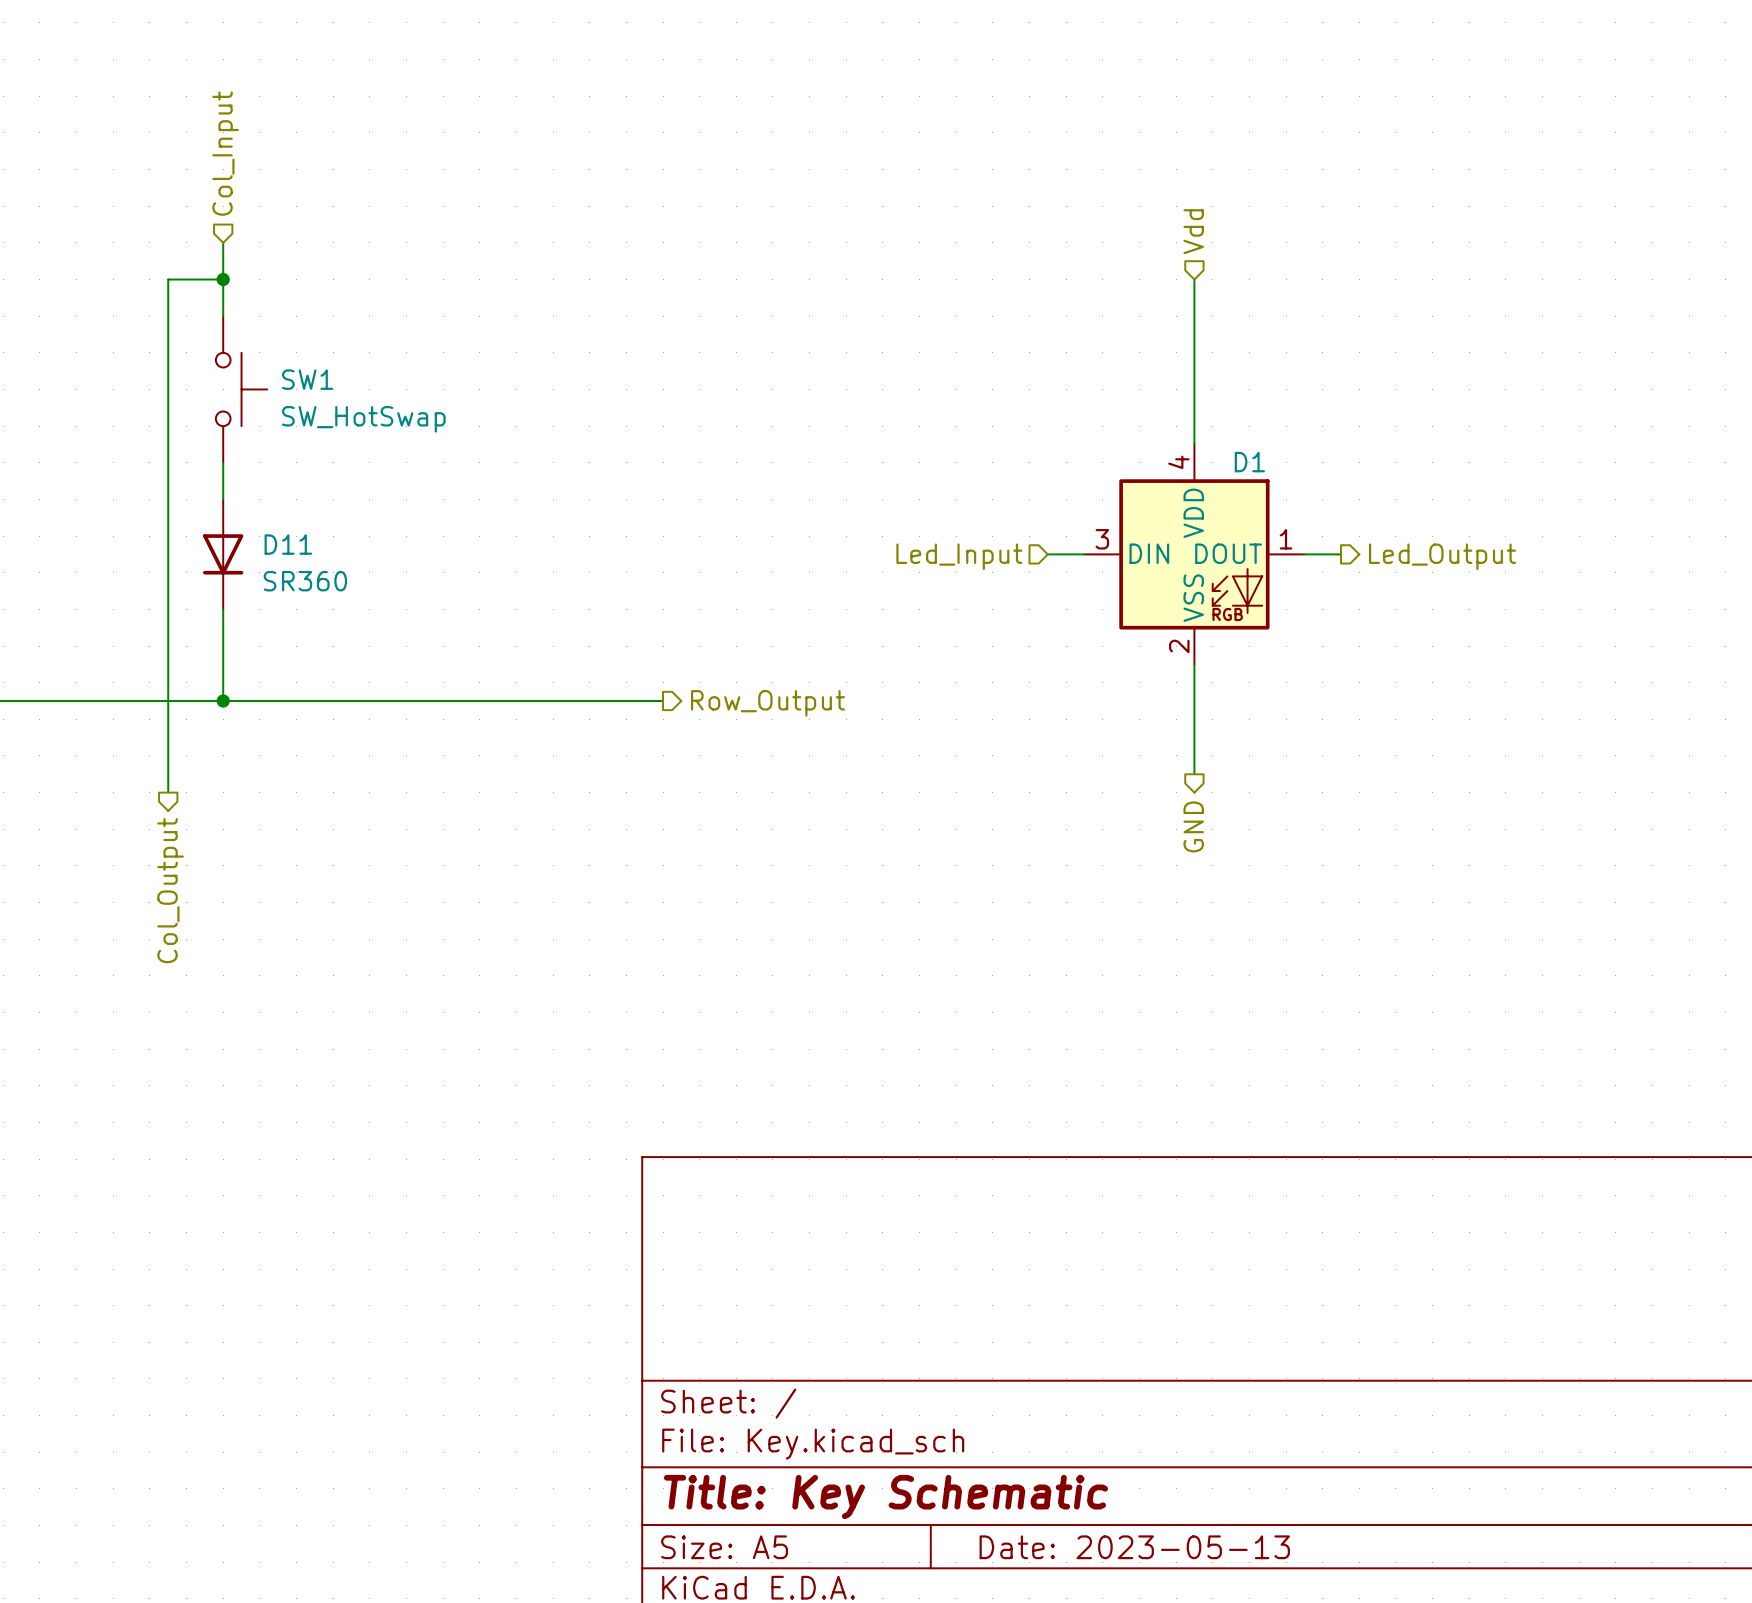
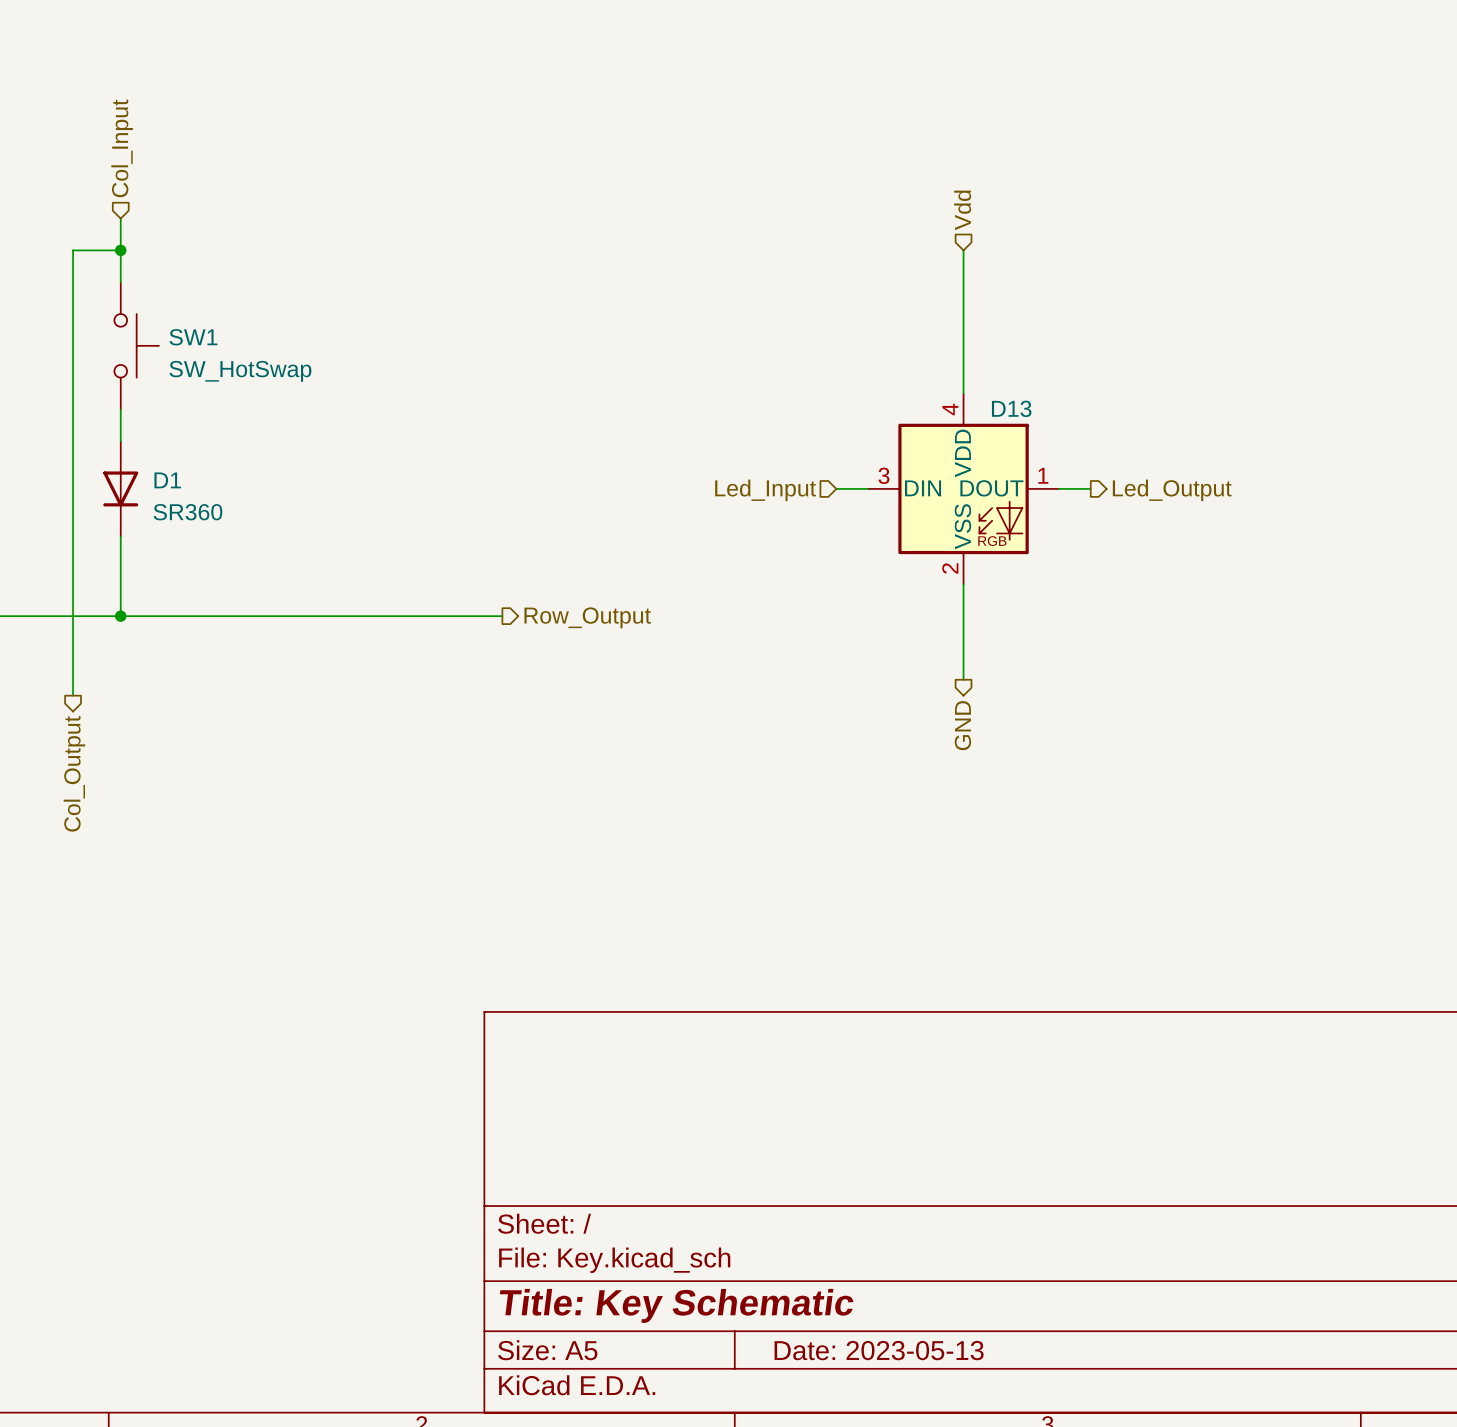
D1 name: D1 (1249, 462) -> D13 (1011, 408)
D11 name: D11 (288, 544) -> D1 (167, 480)

